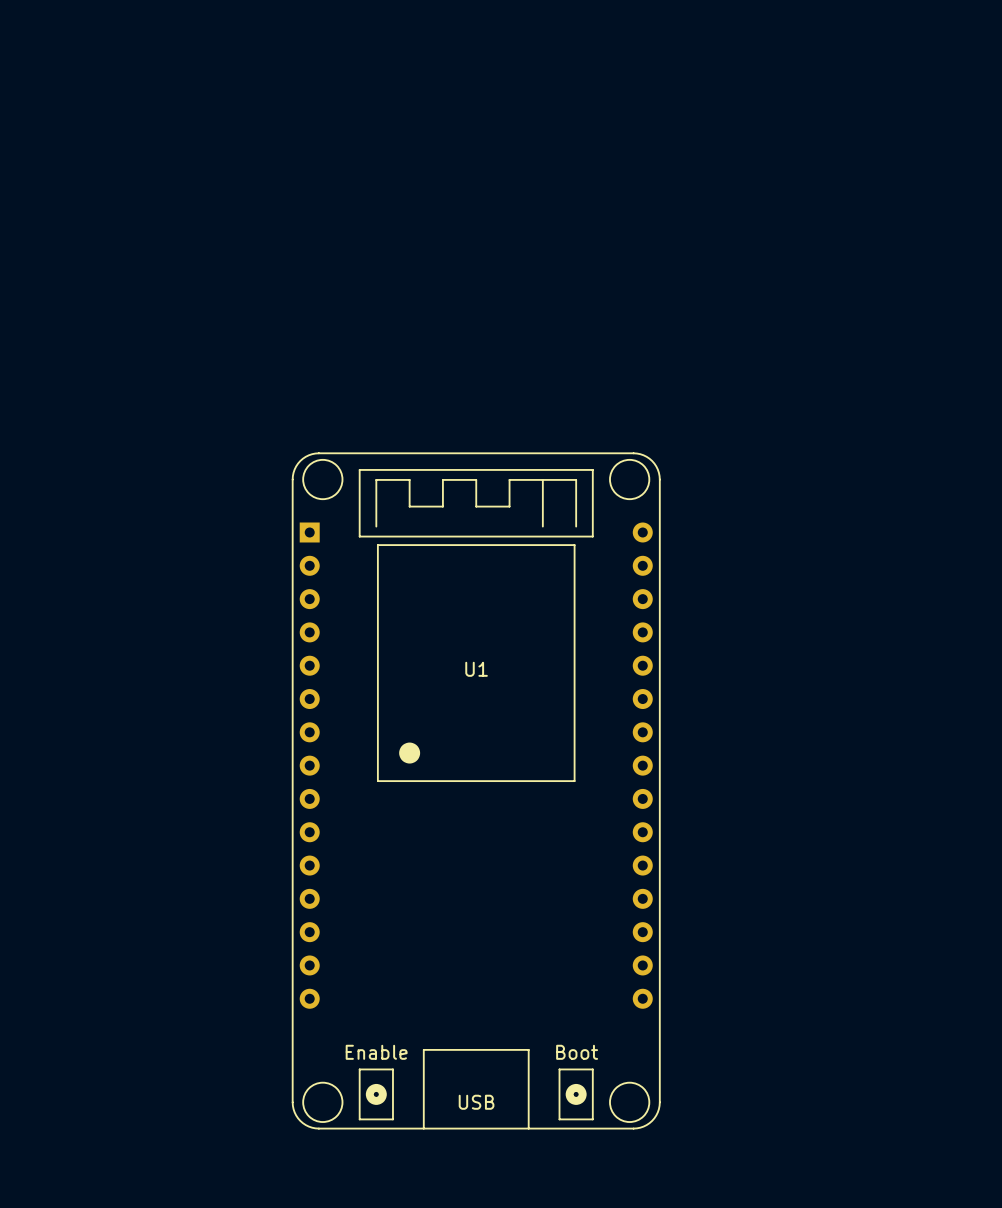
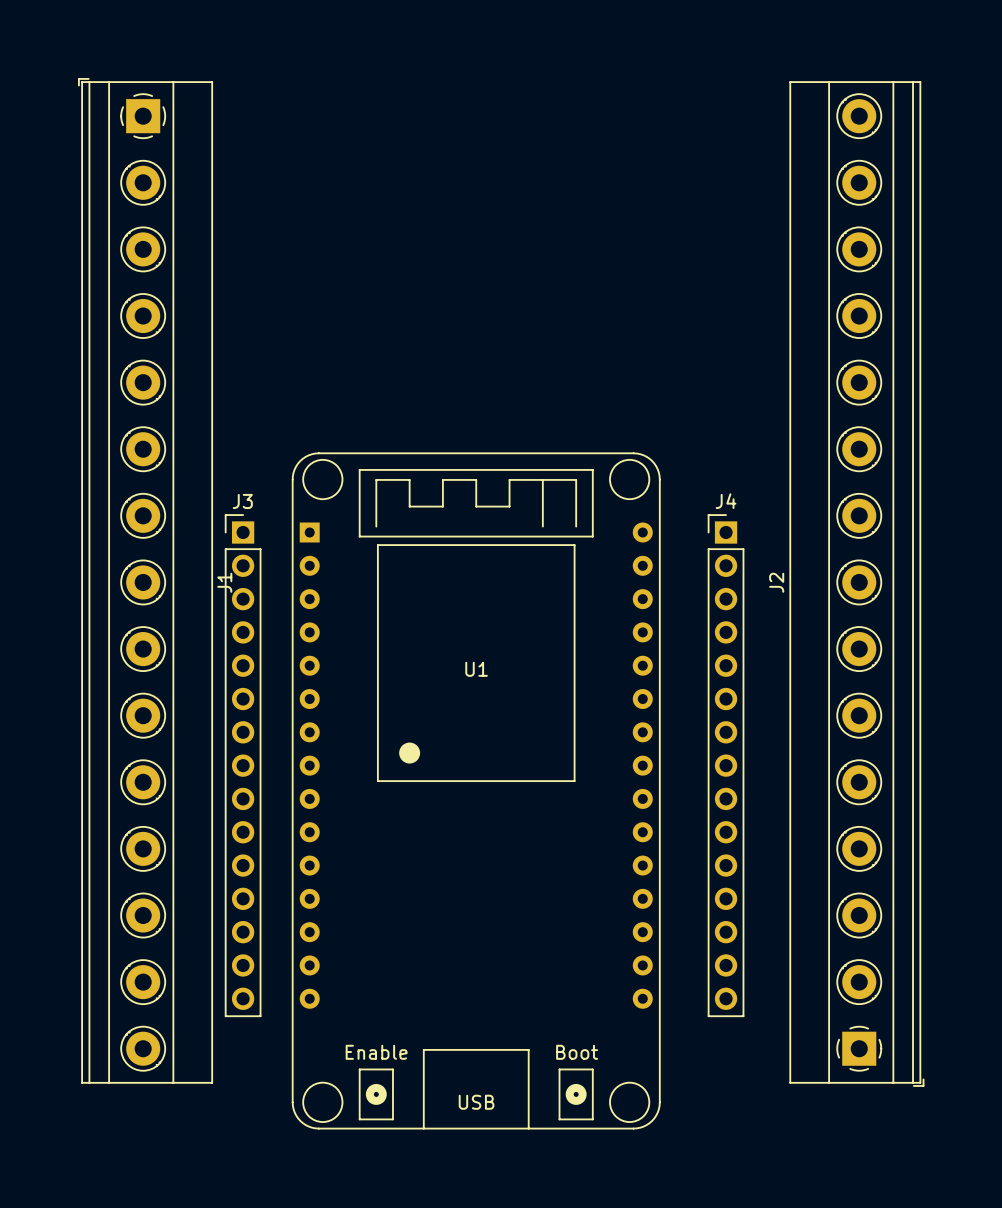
J1: none -> (145, 580)
J2: none -> (856, 584)
J3: none -> (243, 765)
J4: none -> (726, 765)

